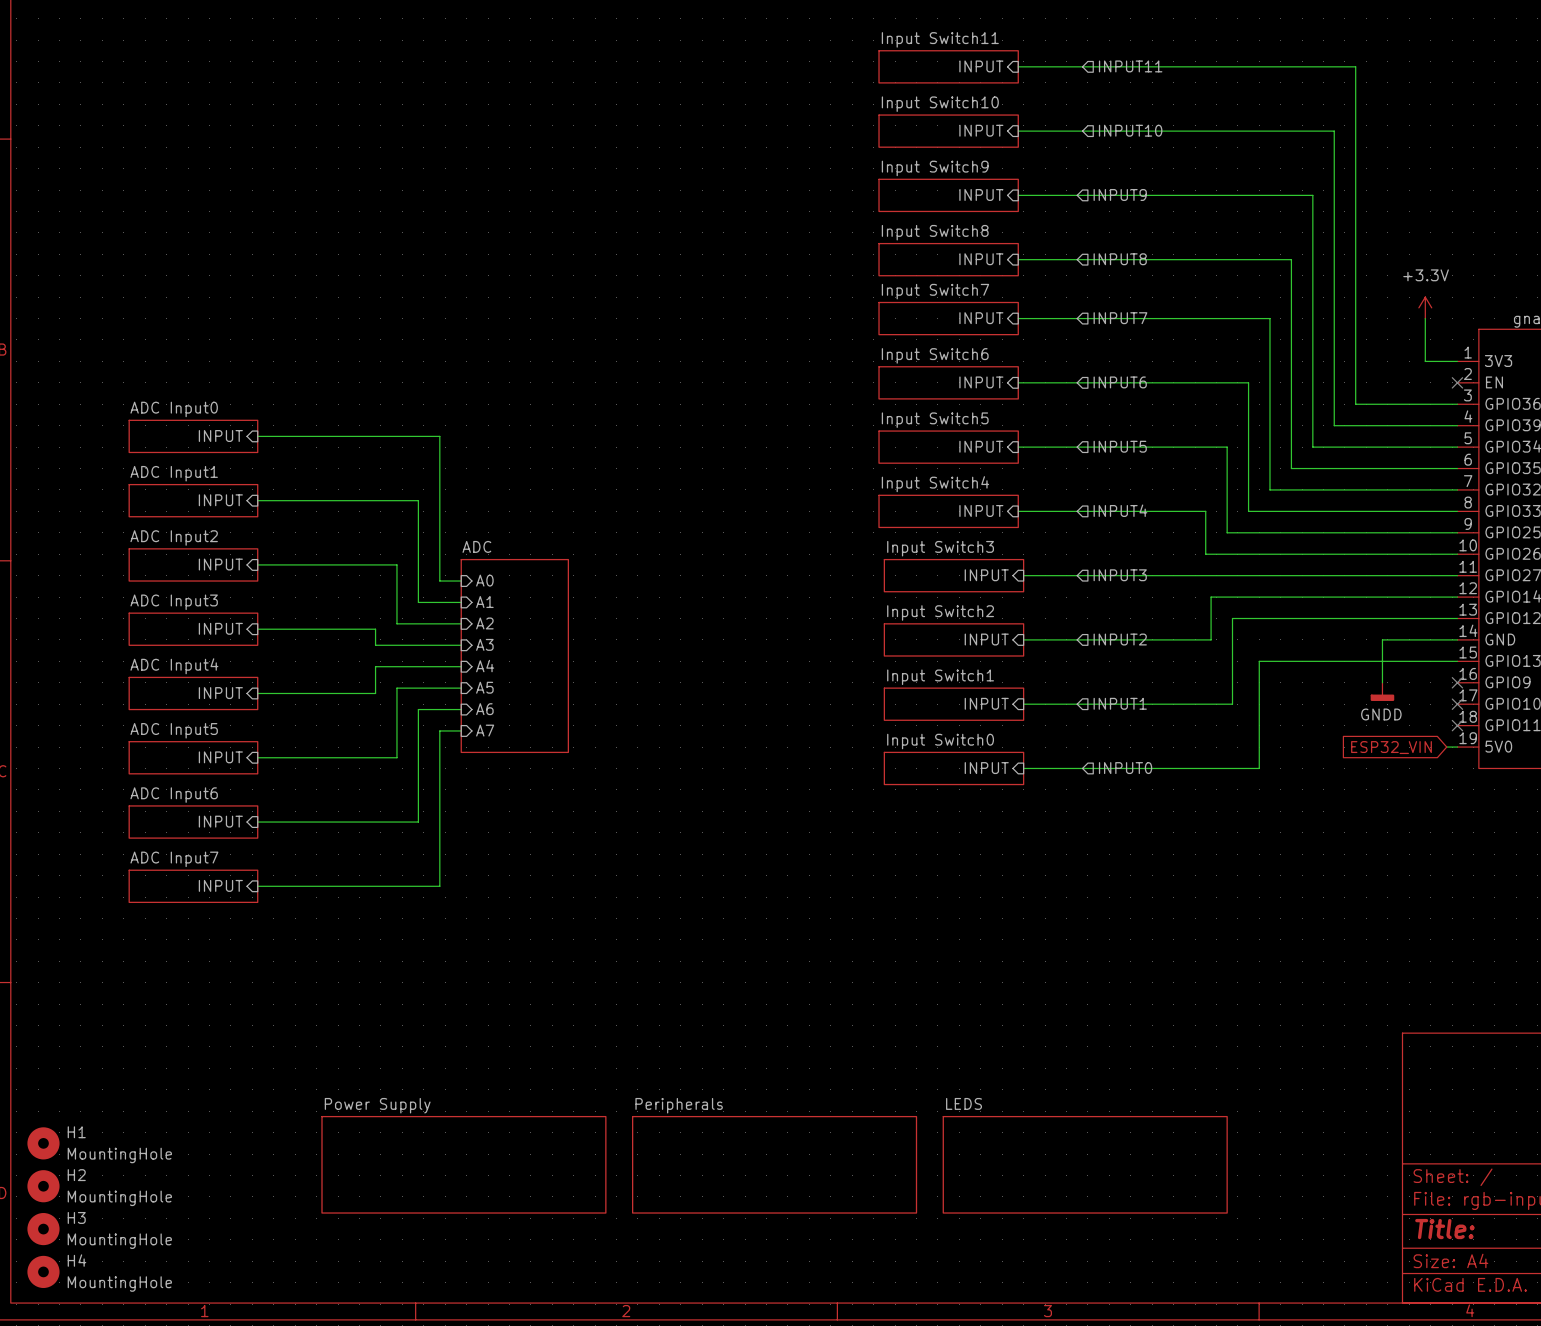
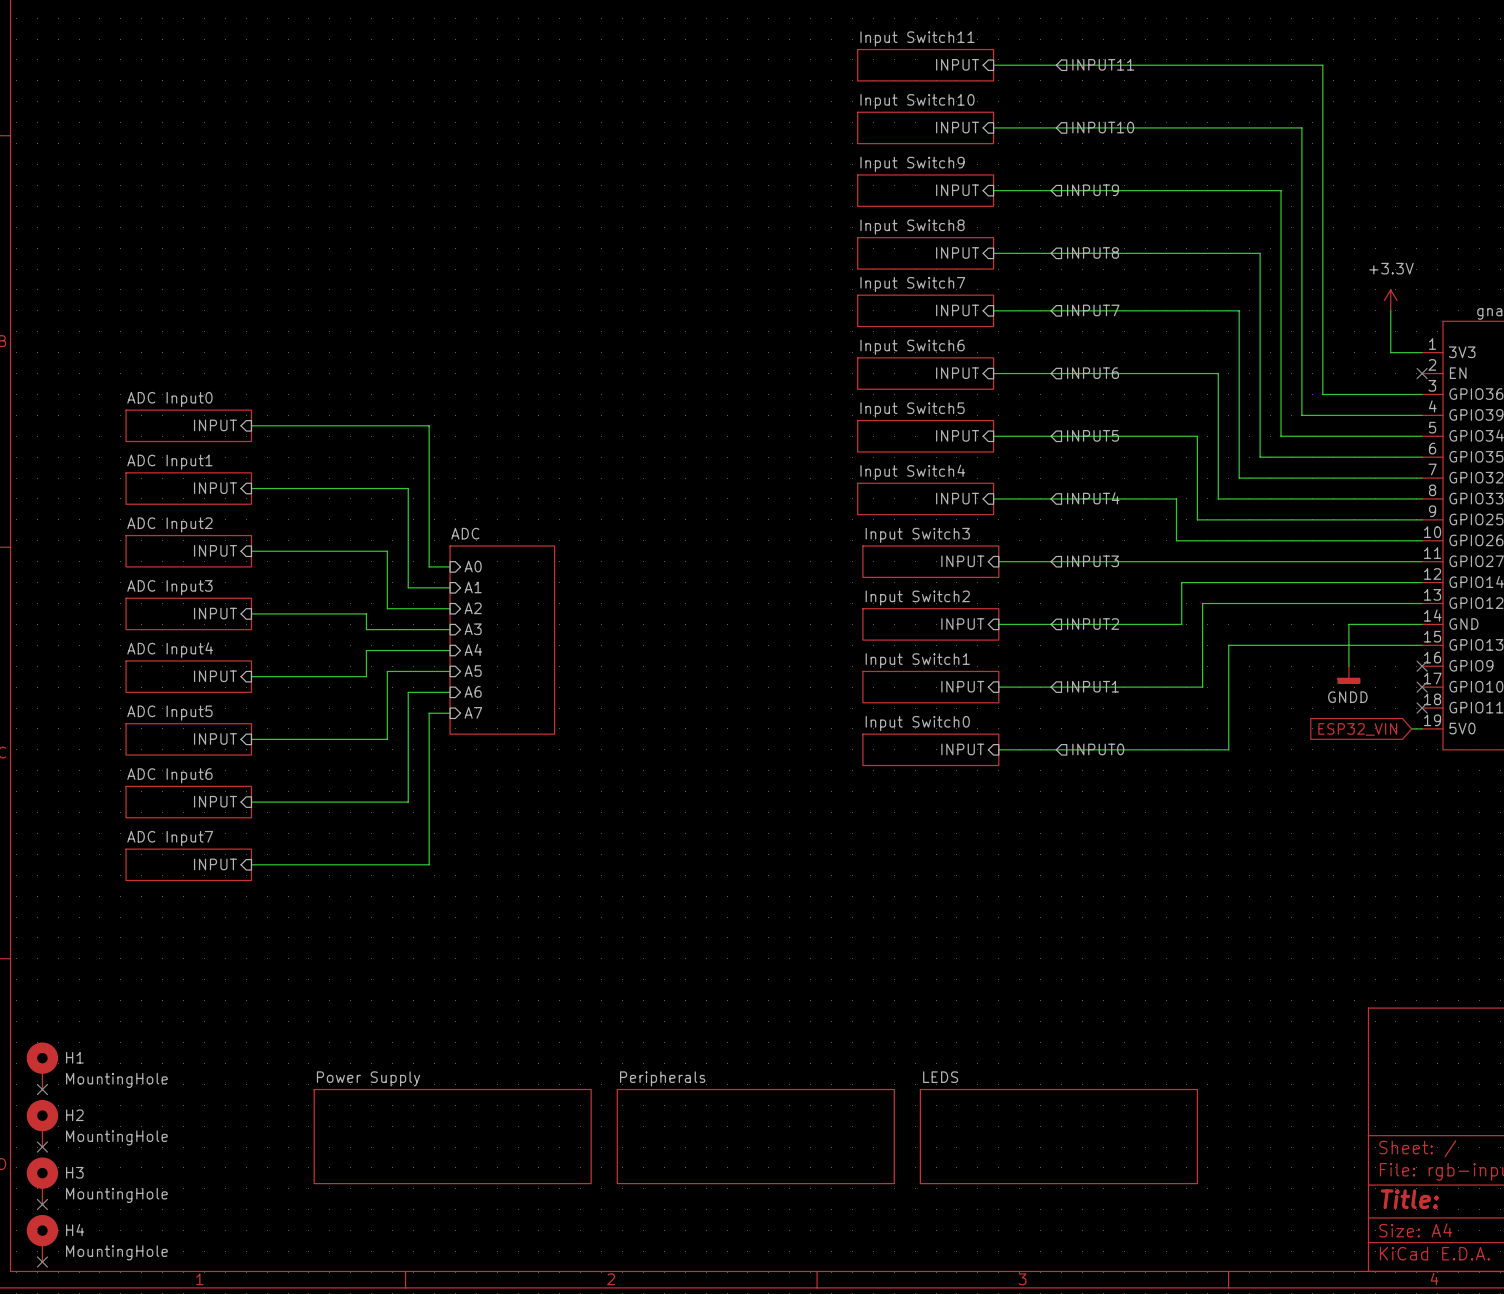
no-connect mark: none -> (42, 1089)
H1 symbol: [27, 1127, 60, 1160] -> [26, 1042, 59, 1090]
H2 symbol: [27, 1170, 60, 1203] -> [26, 1099, 59, 1148]
no-connect mark: none -> (42, 1147)
H3 symbol: [27, 1213, 60, 1246] -> [26, 1157, 59, 1205]
no-connect mark: none -> (42, 1204)
H4 symbol: [27, 1255, 60, 1288] -> [26, 1214, 59, 1262]
no-connect mark: none -> (42, 1261)

